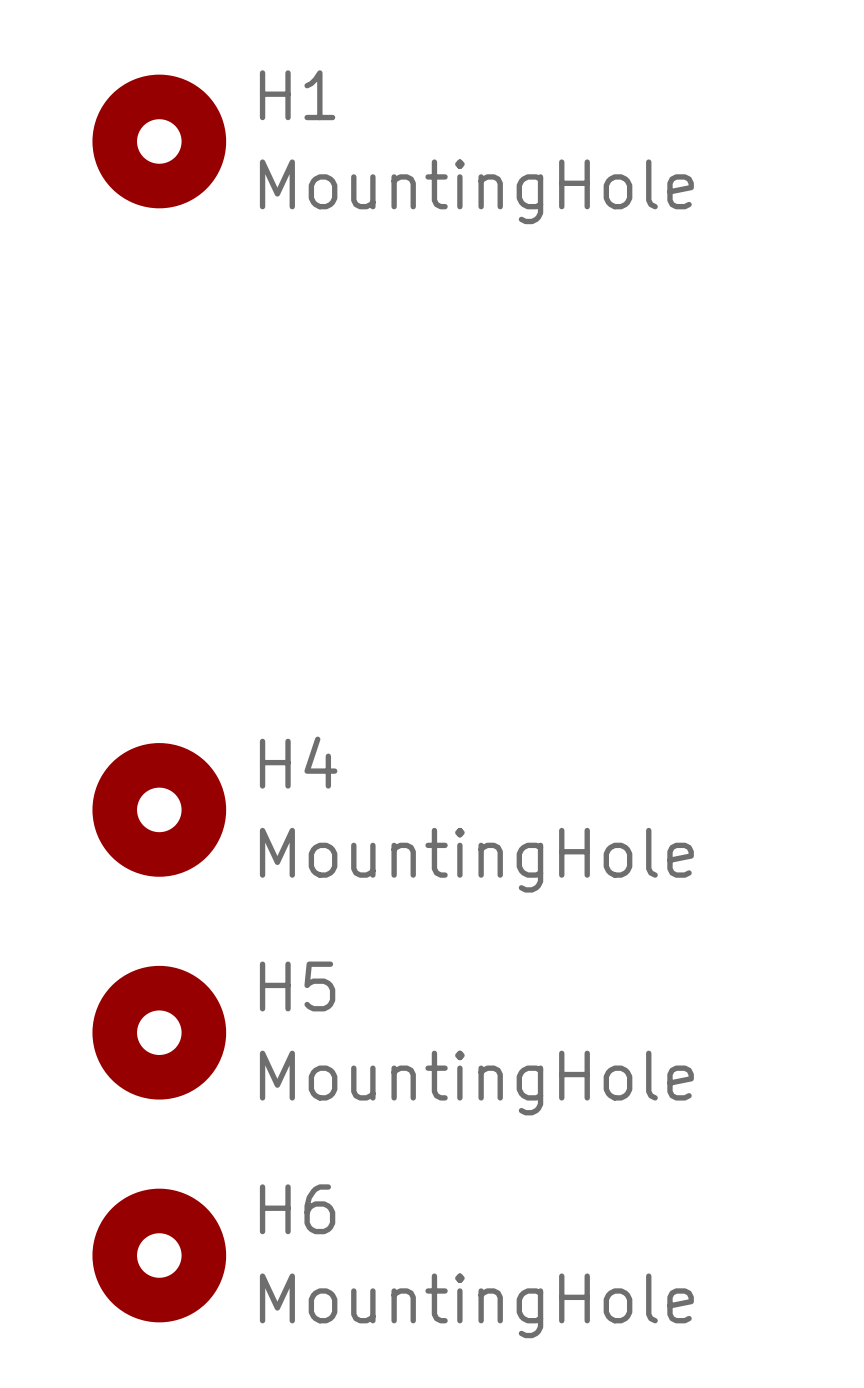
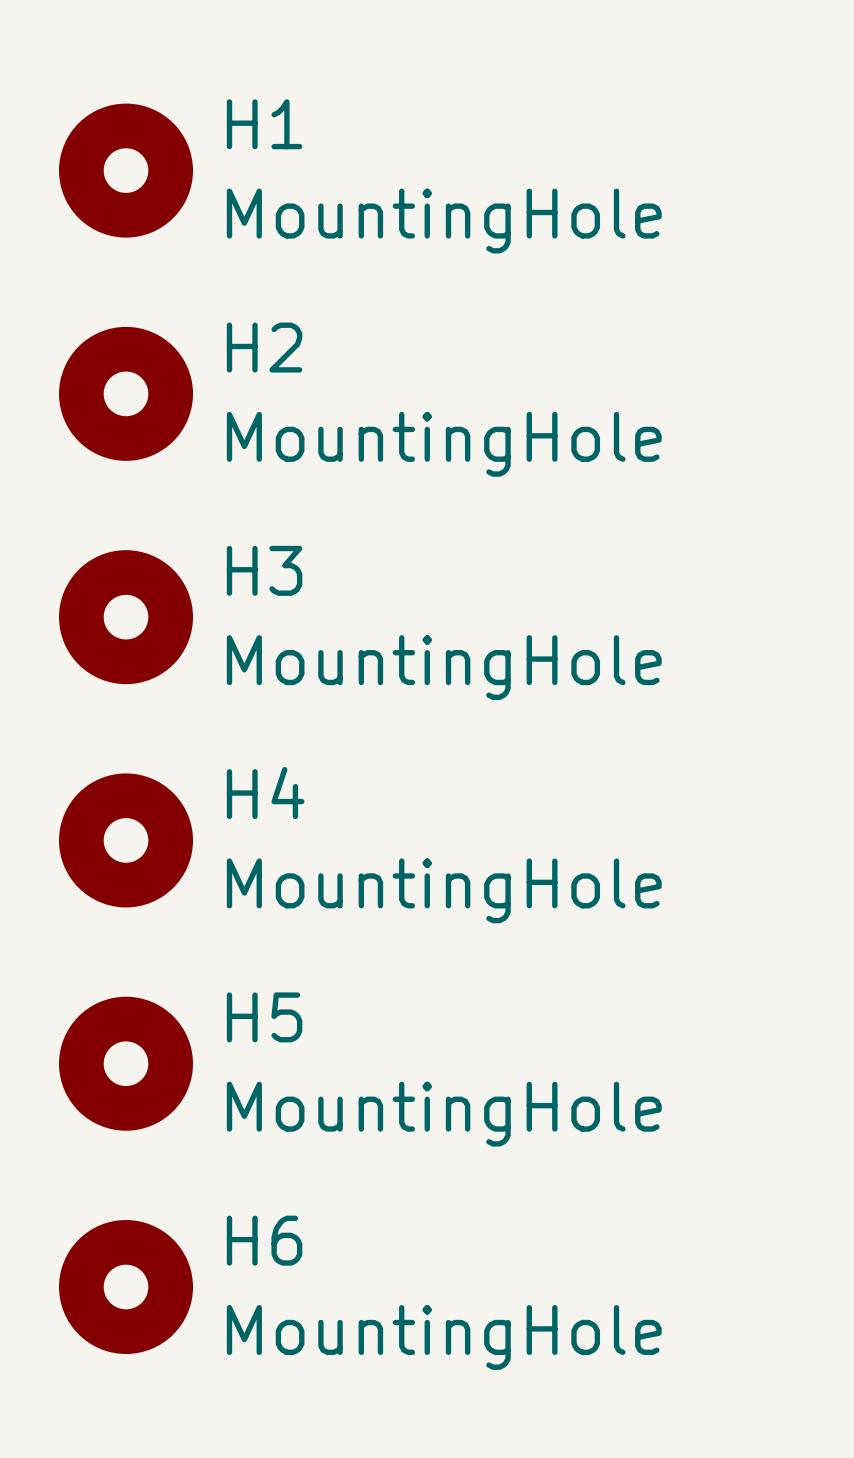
H2: none -> MountingHole (126, 393)
H3: none -> MountingHole (126, 617)

